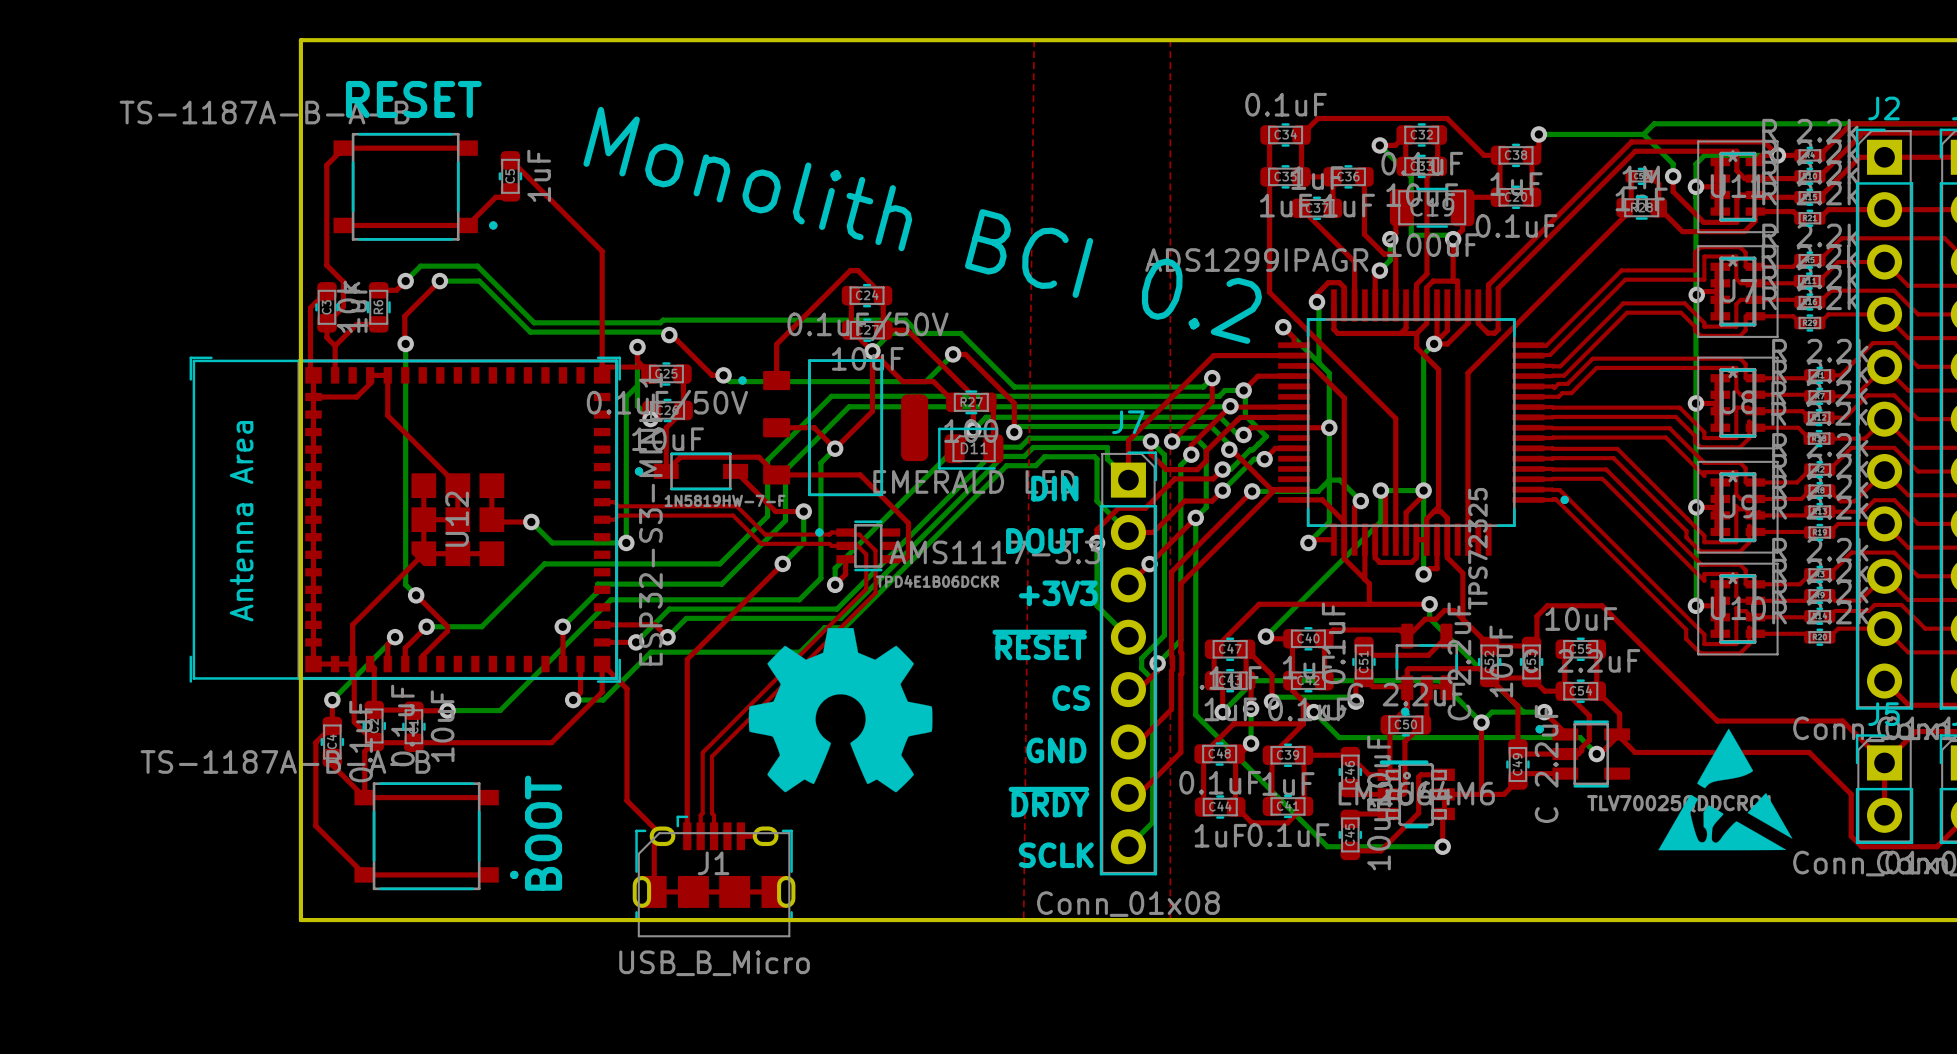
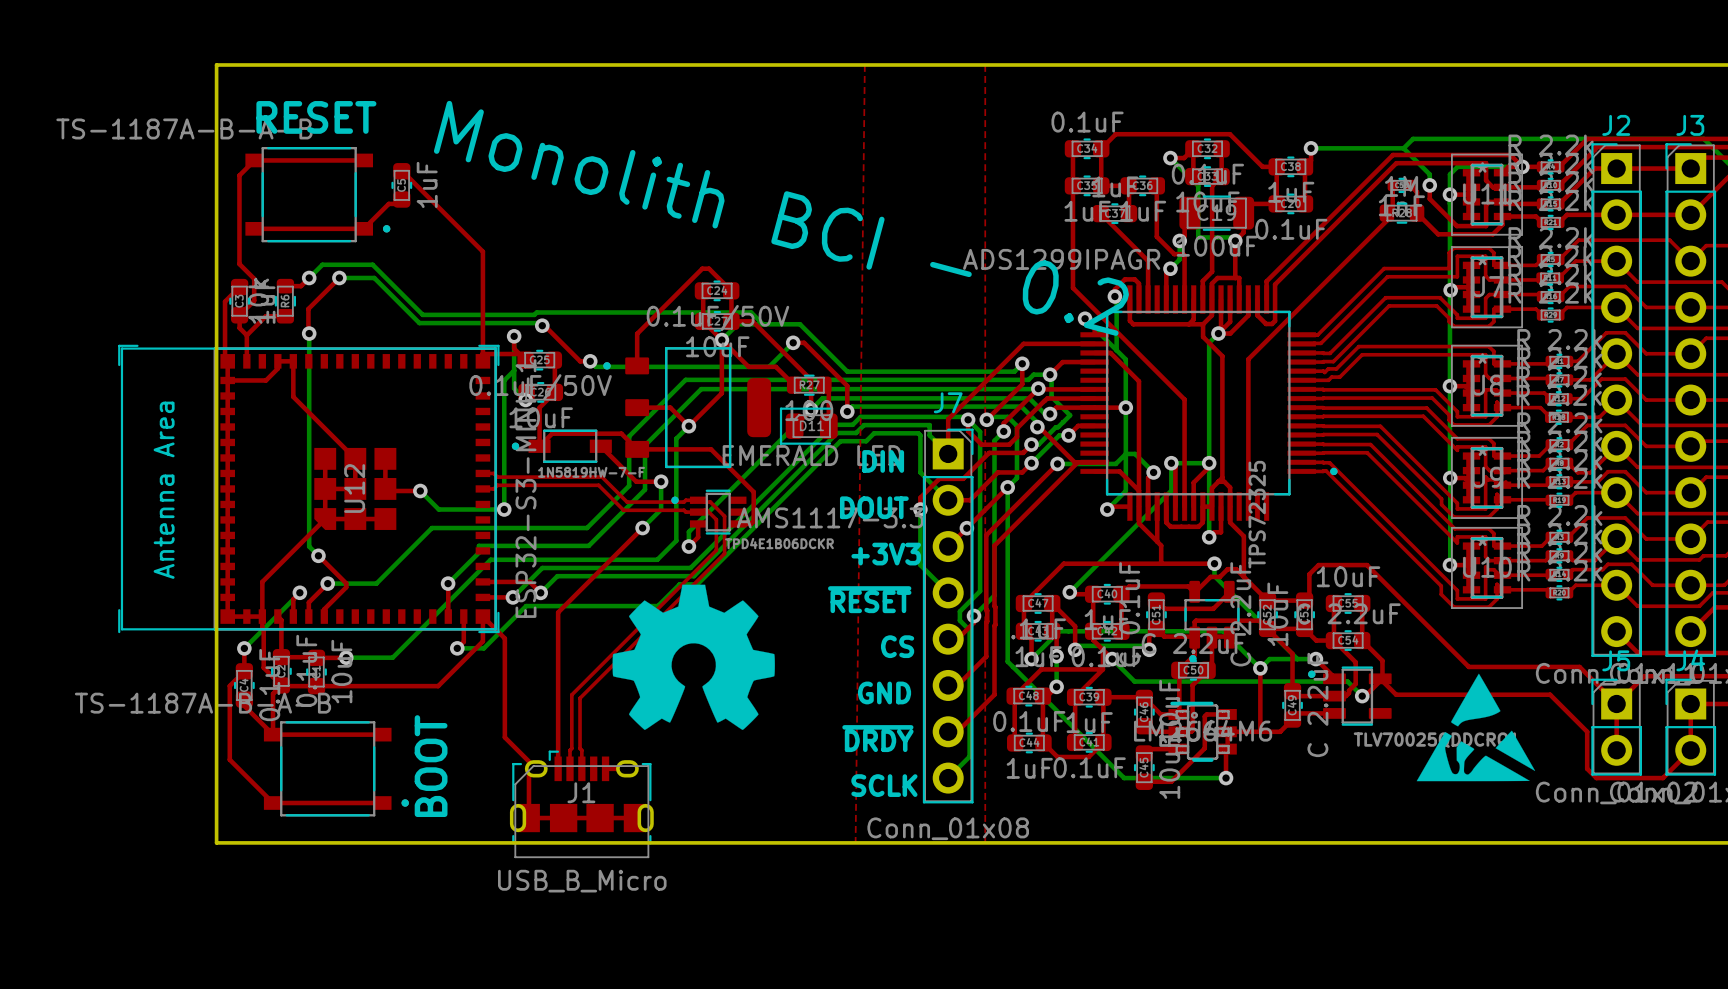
text: Monolith BCI 0.2 (922, 225) -> Monolith BCI - 0.2 (781, 218)

